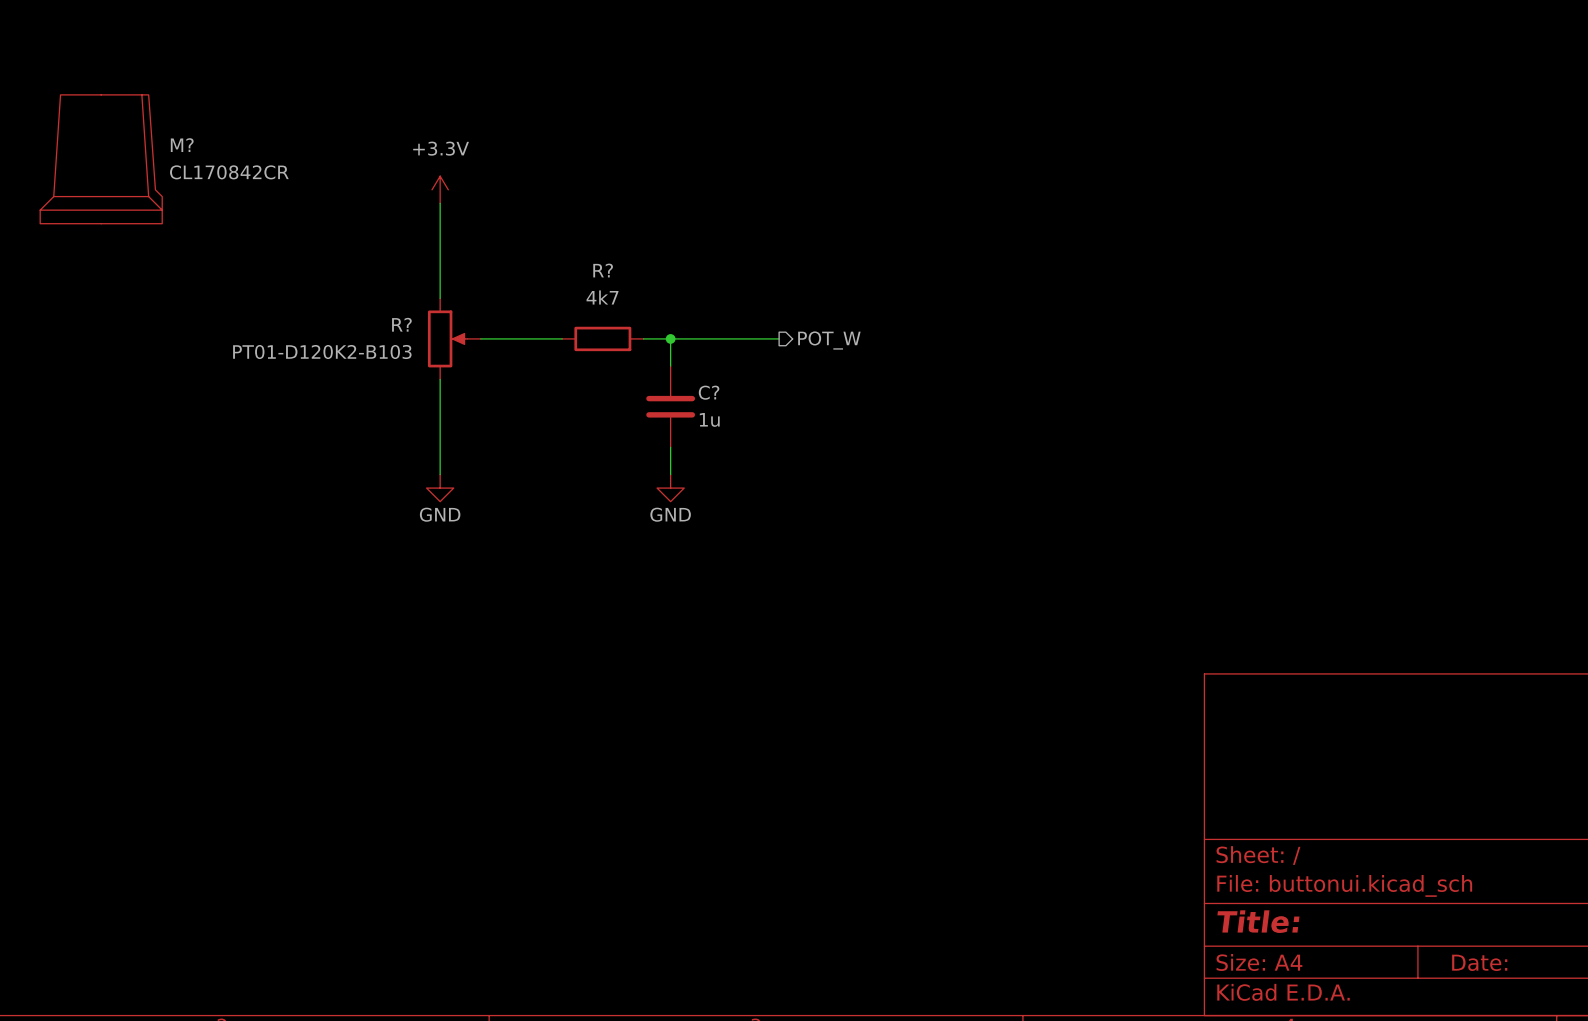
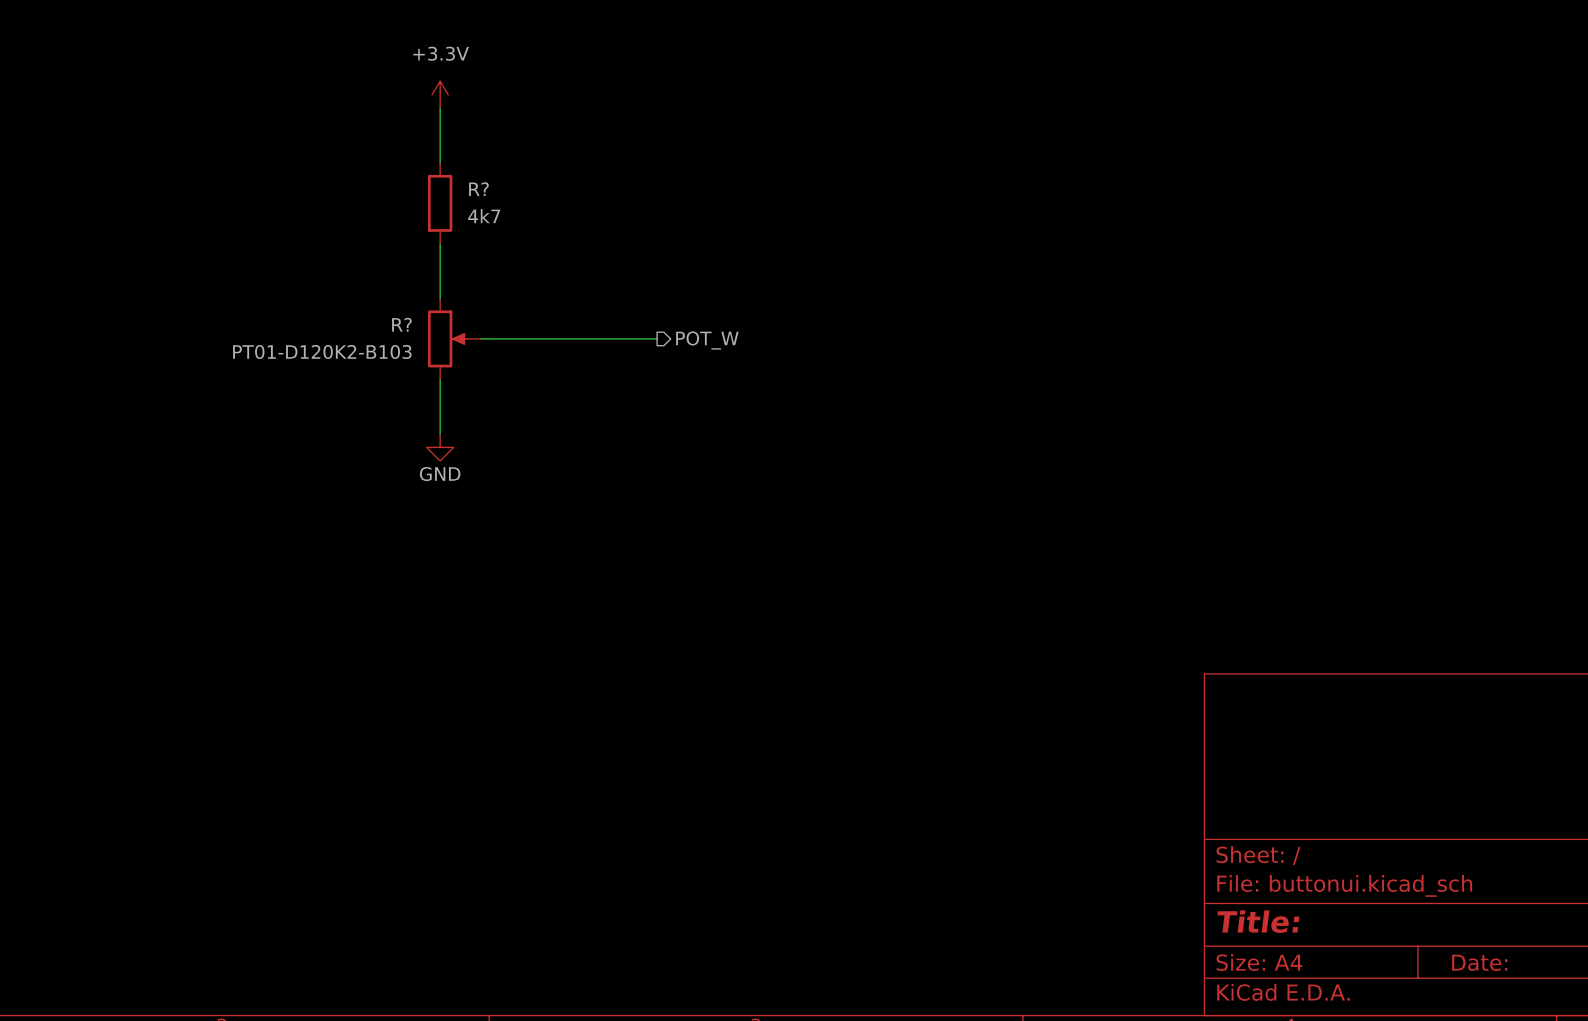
wire: none -> (440, 108) (440, 162)
M?: (101, 159) -> none
power symbol position: +3.3V (440, 189) -> +3.3V (440, 94)
wire: (440, 203) (440, 244) -> none
R? name position: R? (603, 270) -> R? (478, 189)
wire: none -> (562, 338) (643, 338)
R? rotation: 0° (602, 338) -> 90° clockwise (440, 203)
R? position: (602, 338) -> (440, 203)
wire: (657, 338) (779, 338) -> none
wire: (670, 338) (670, 366) -> none
junction: (670, 338) -> none
hierarchical label position: POT_W (829, 340) -> POT_W (707, 340)
C?: (670, 406) -> none
wire: (440, 433) (440, 474) -> none
wire: (670, 447) (670, 474) -> none
power symbol position: GND (440, 488) -> GND (440, 447)
power symbol: GND (670, 488) -> none

